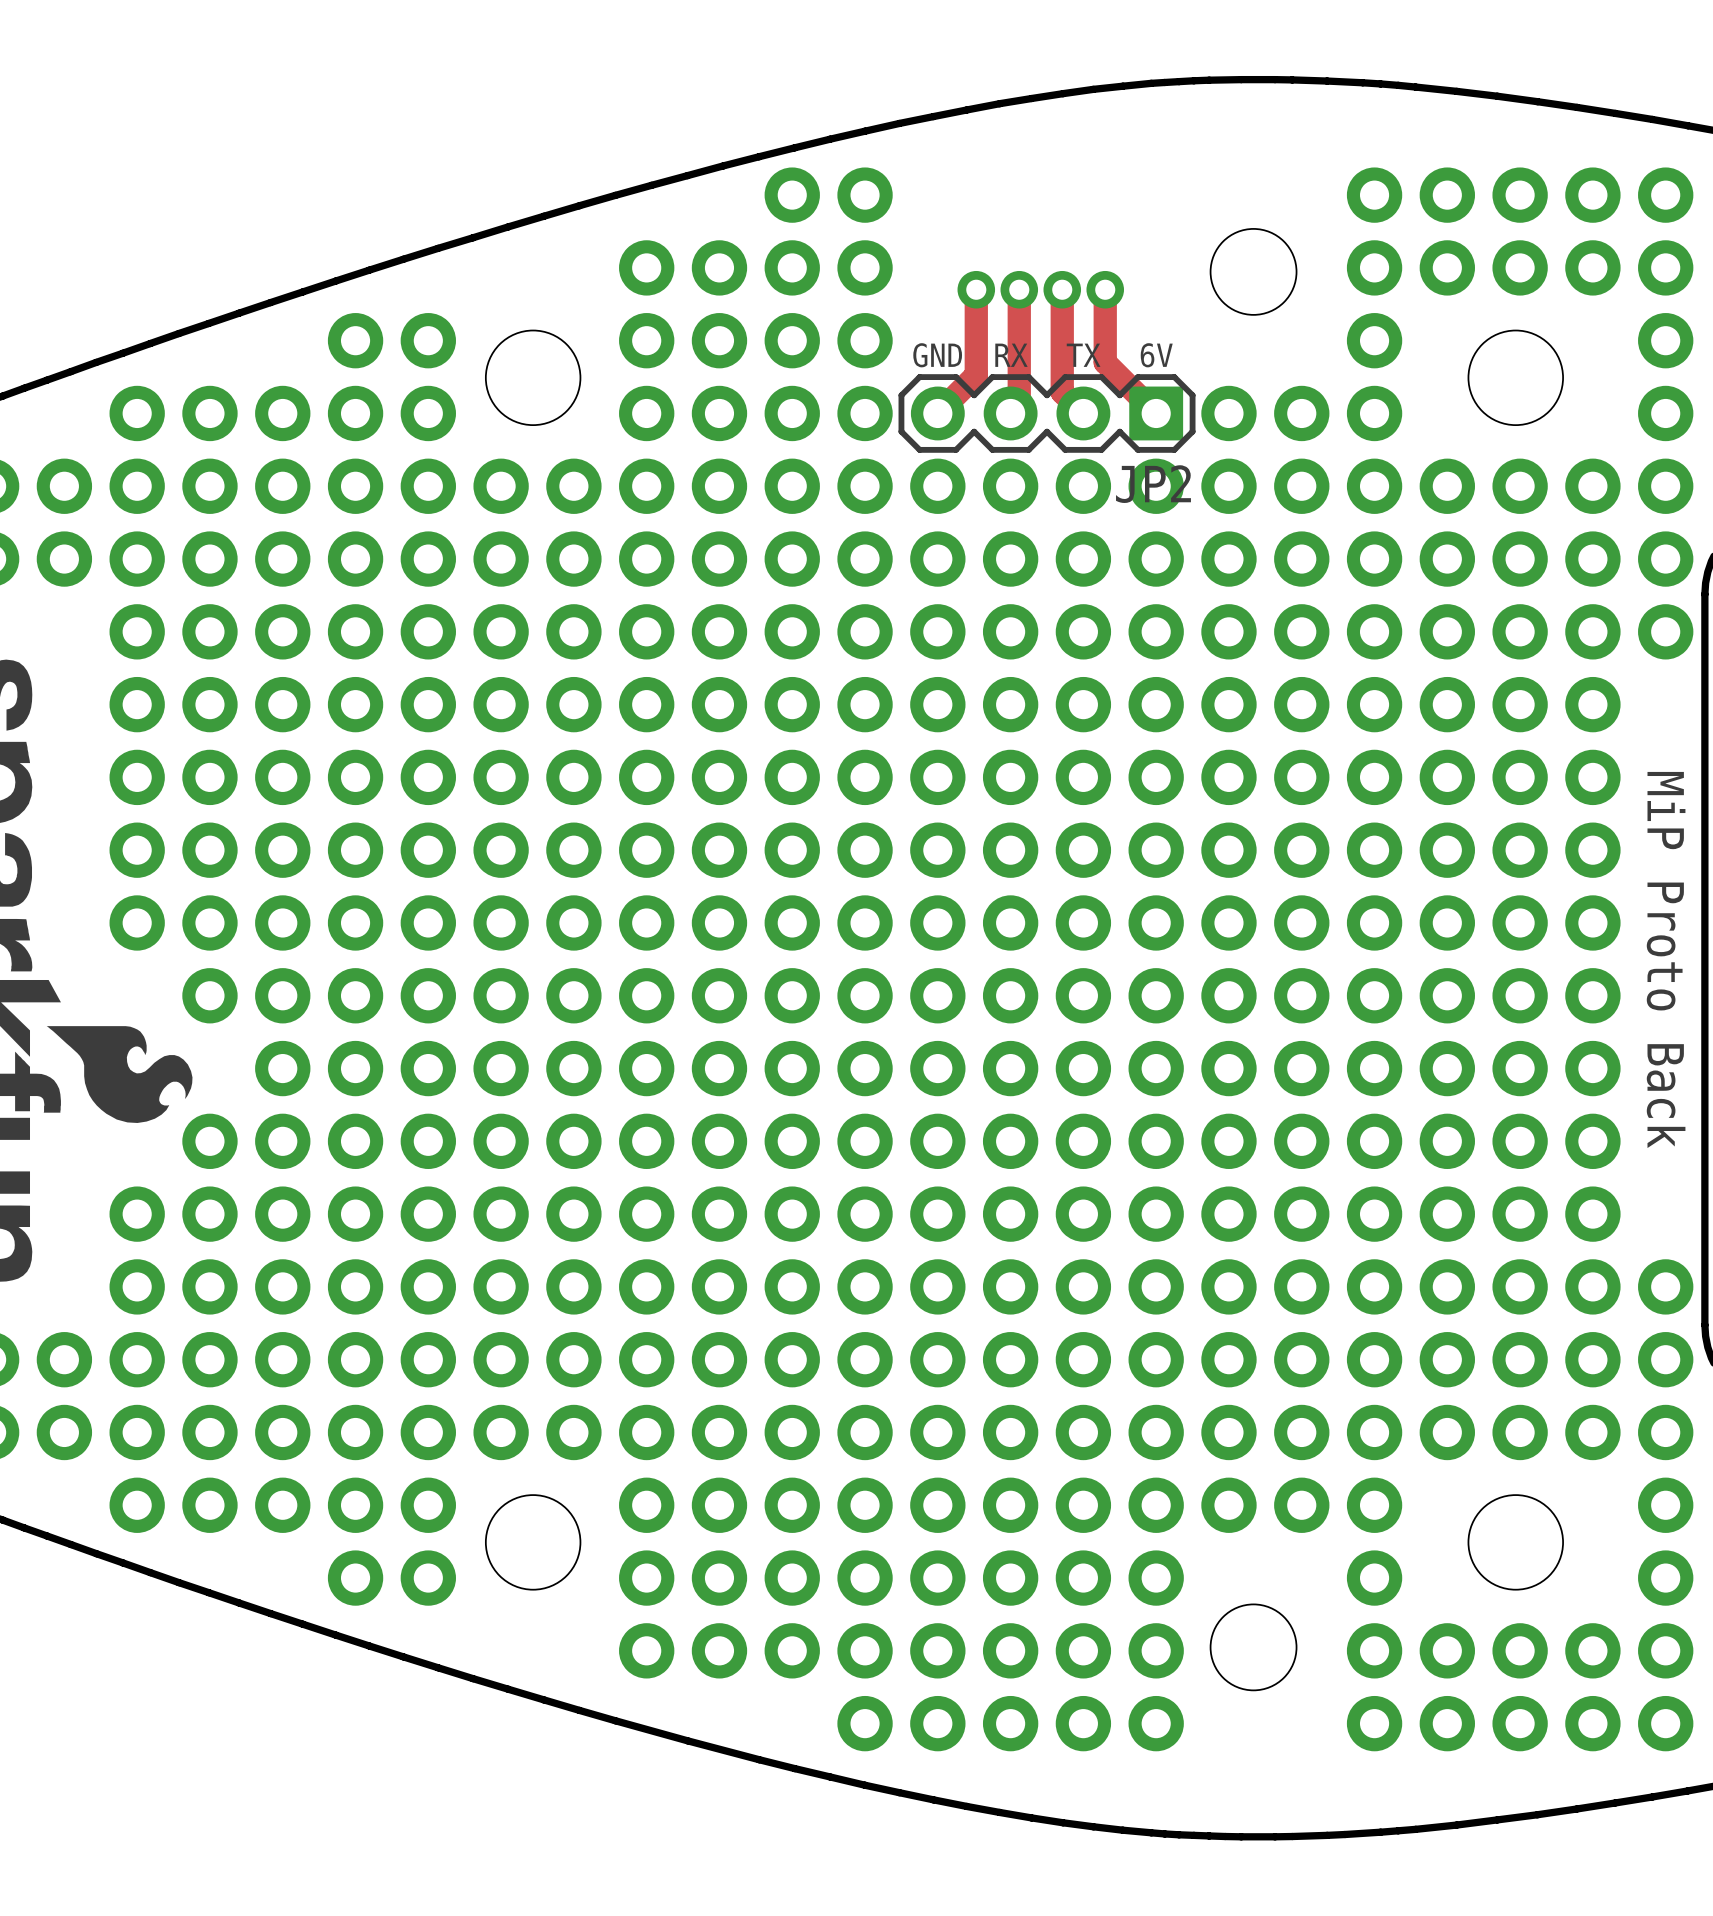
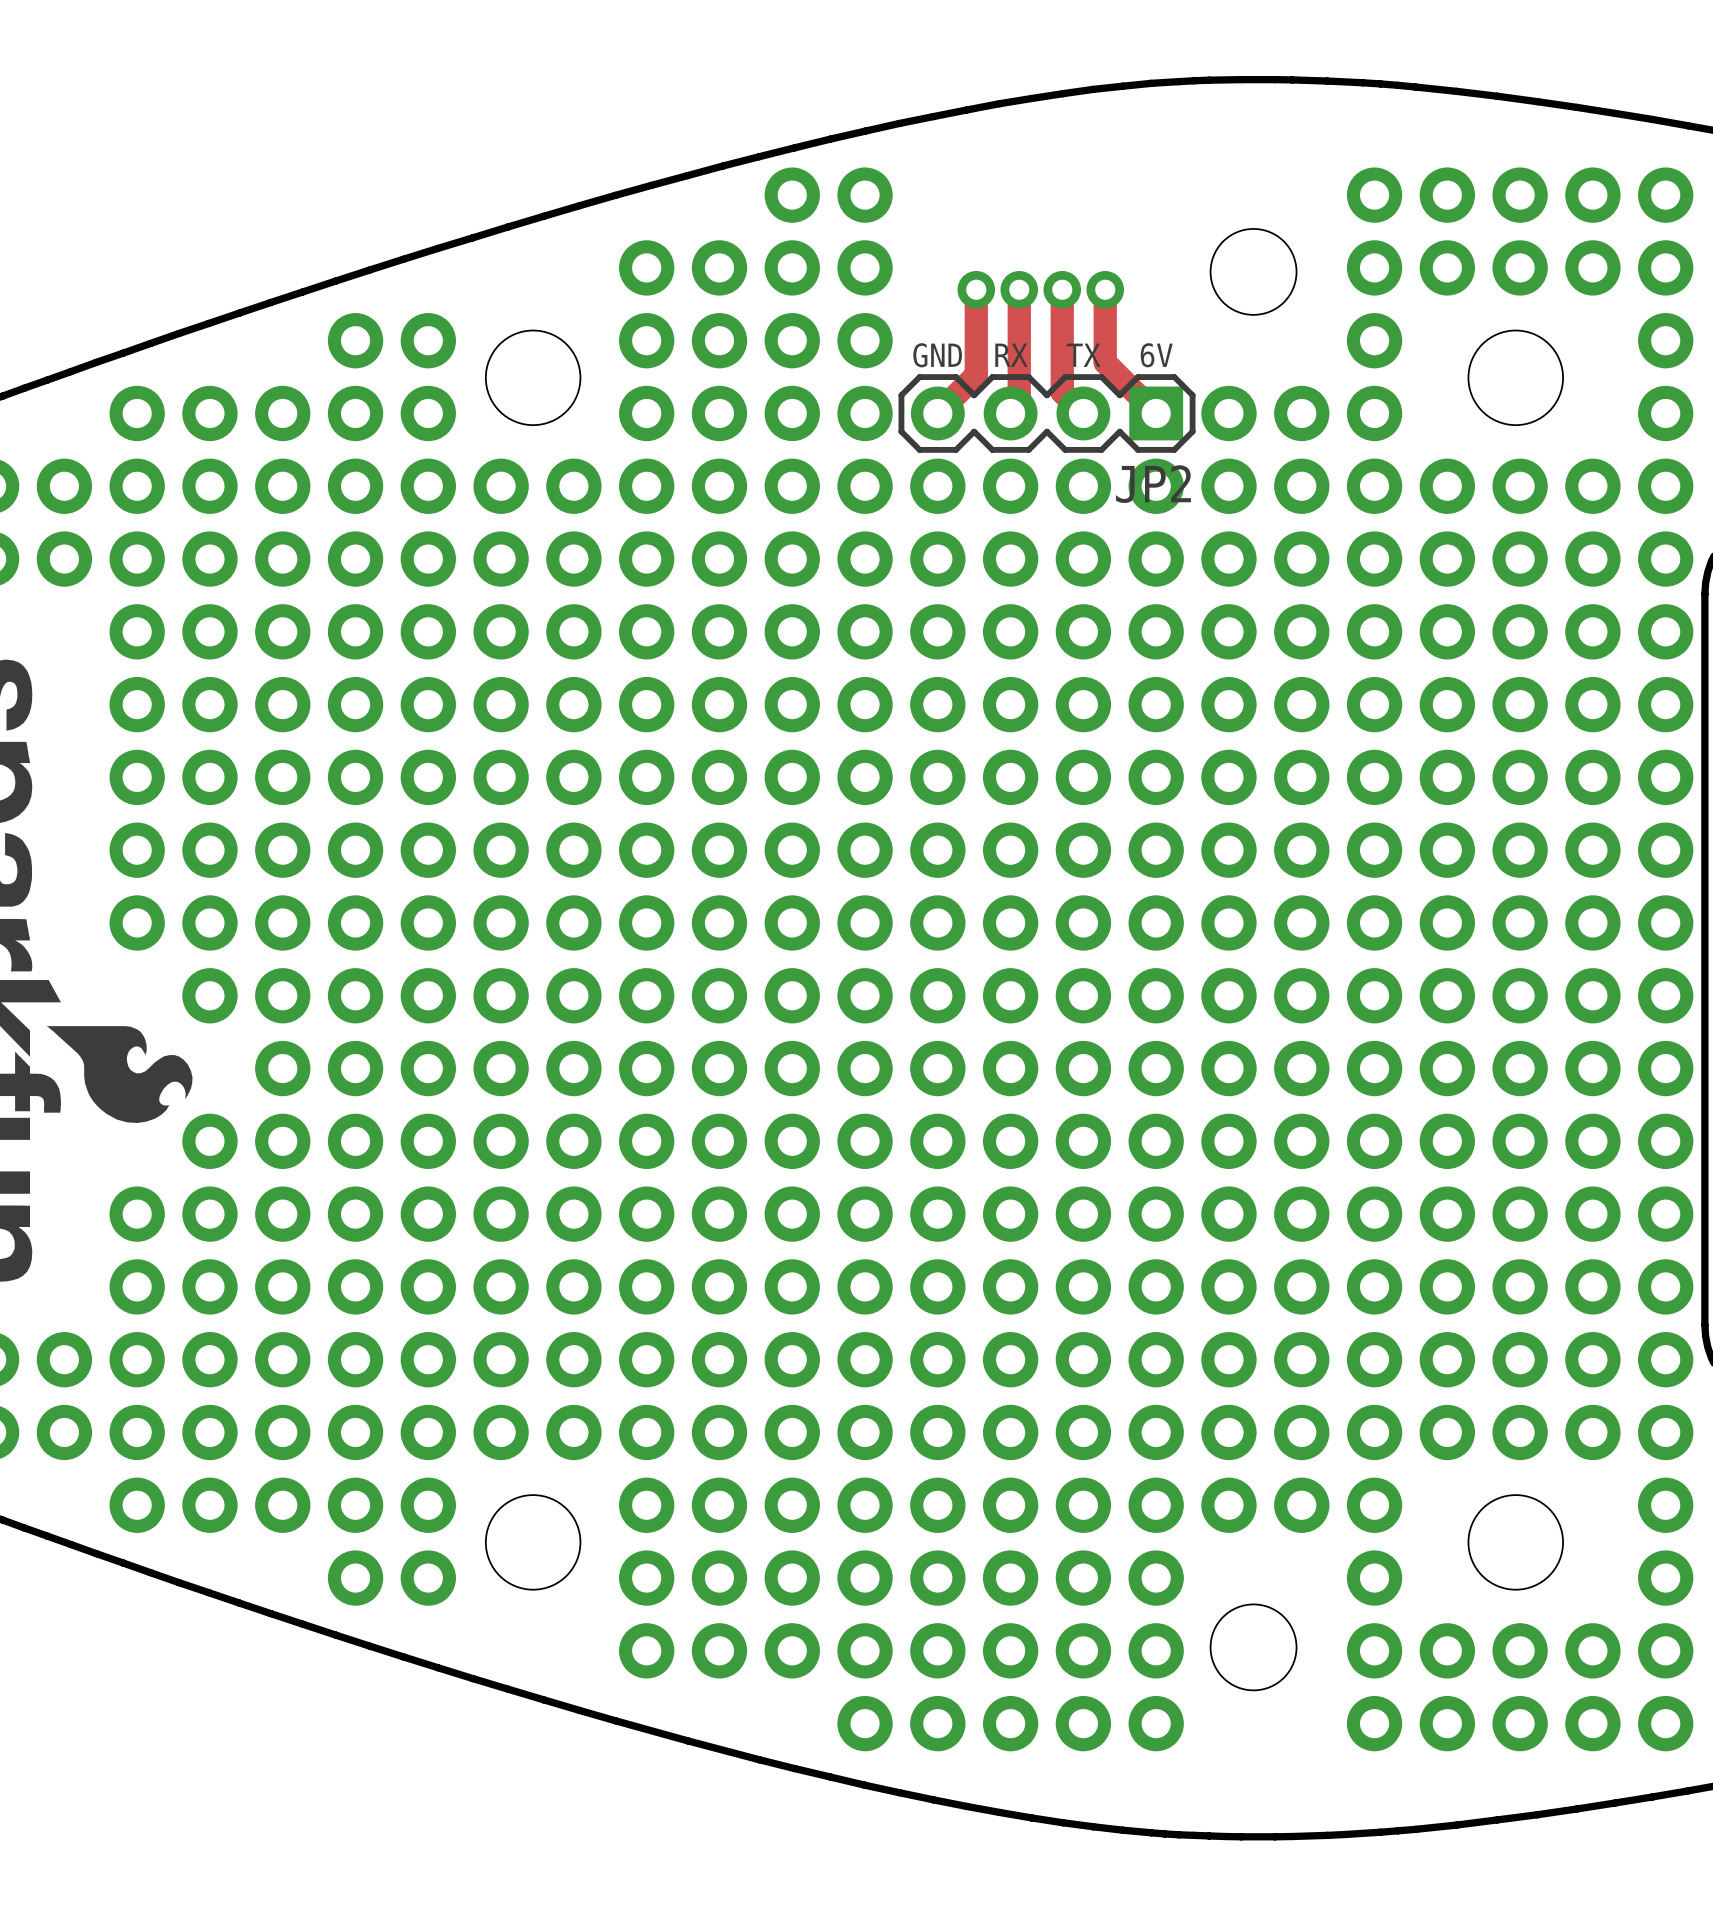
via: none -> (1665, 704)
via: none -> (1665, 777)
via: none -> (1665, 850)
via: none -> (1665, 922)
text: MiP Proto Back (1666, 959) -> none
via: none -> (1665, 995)
via: none -> (1665, 1068)
via: none -> (1665, 1141)
via: none -> (1665, 1214)

